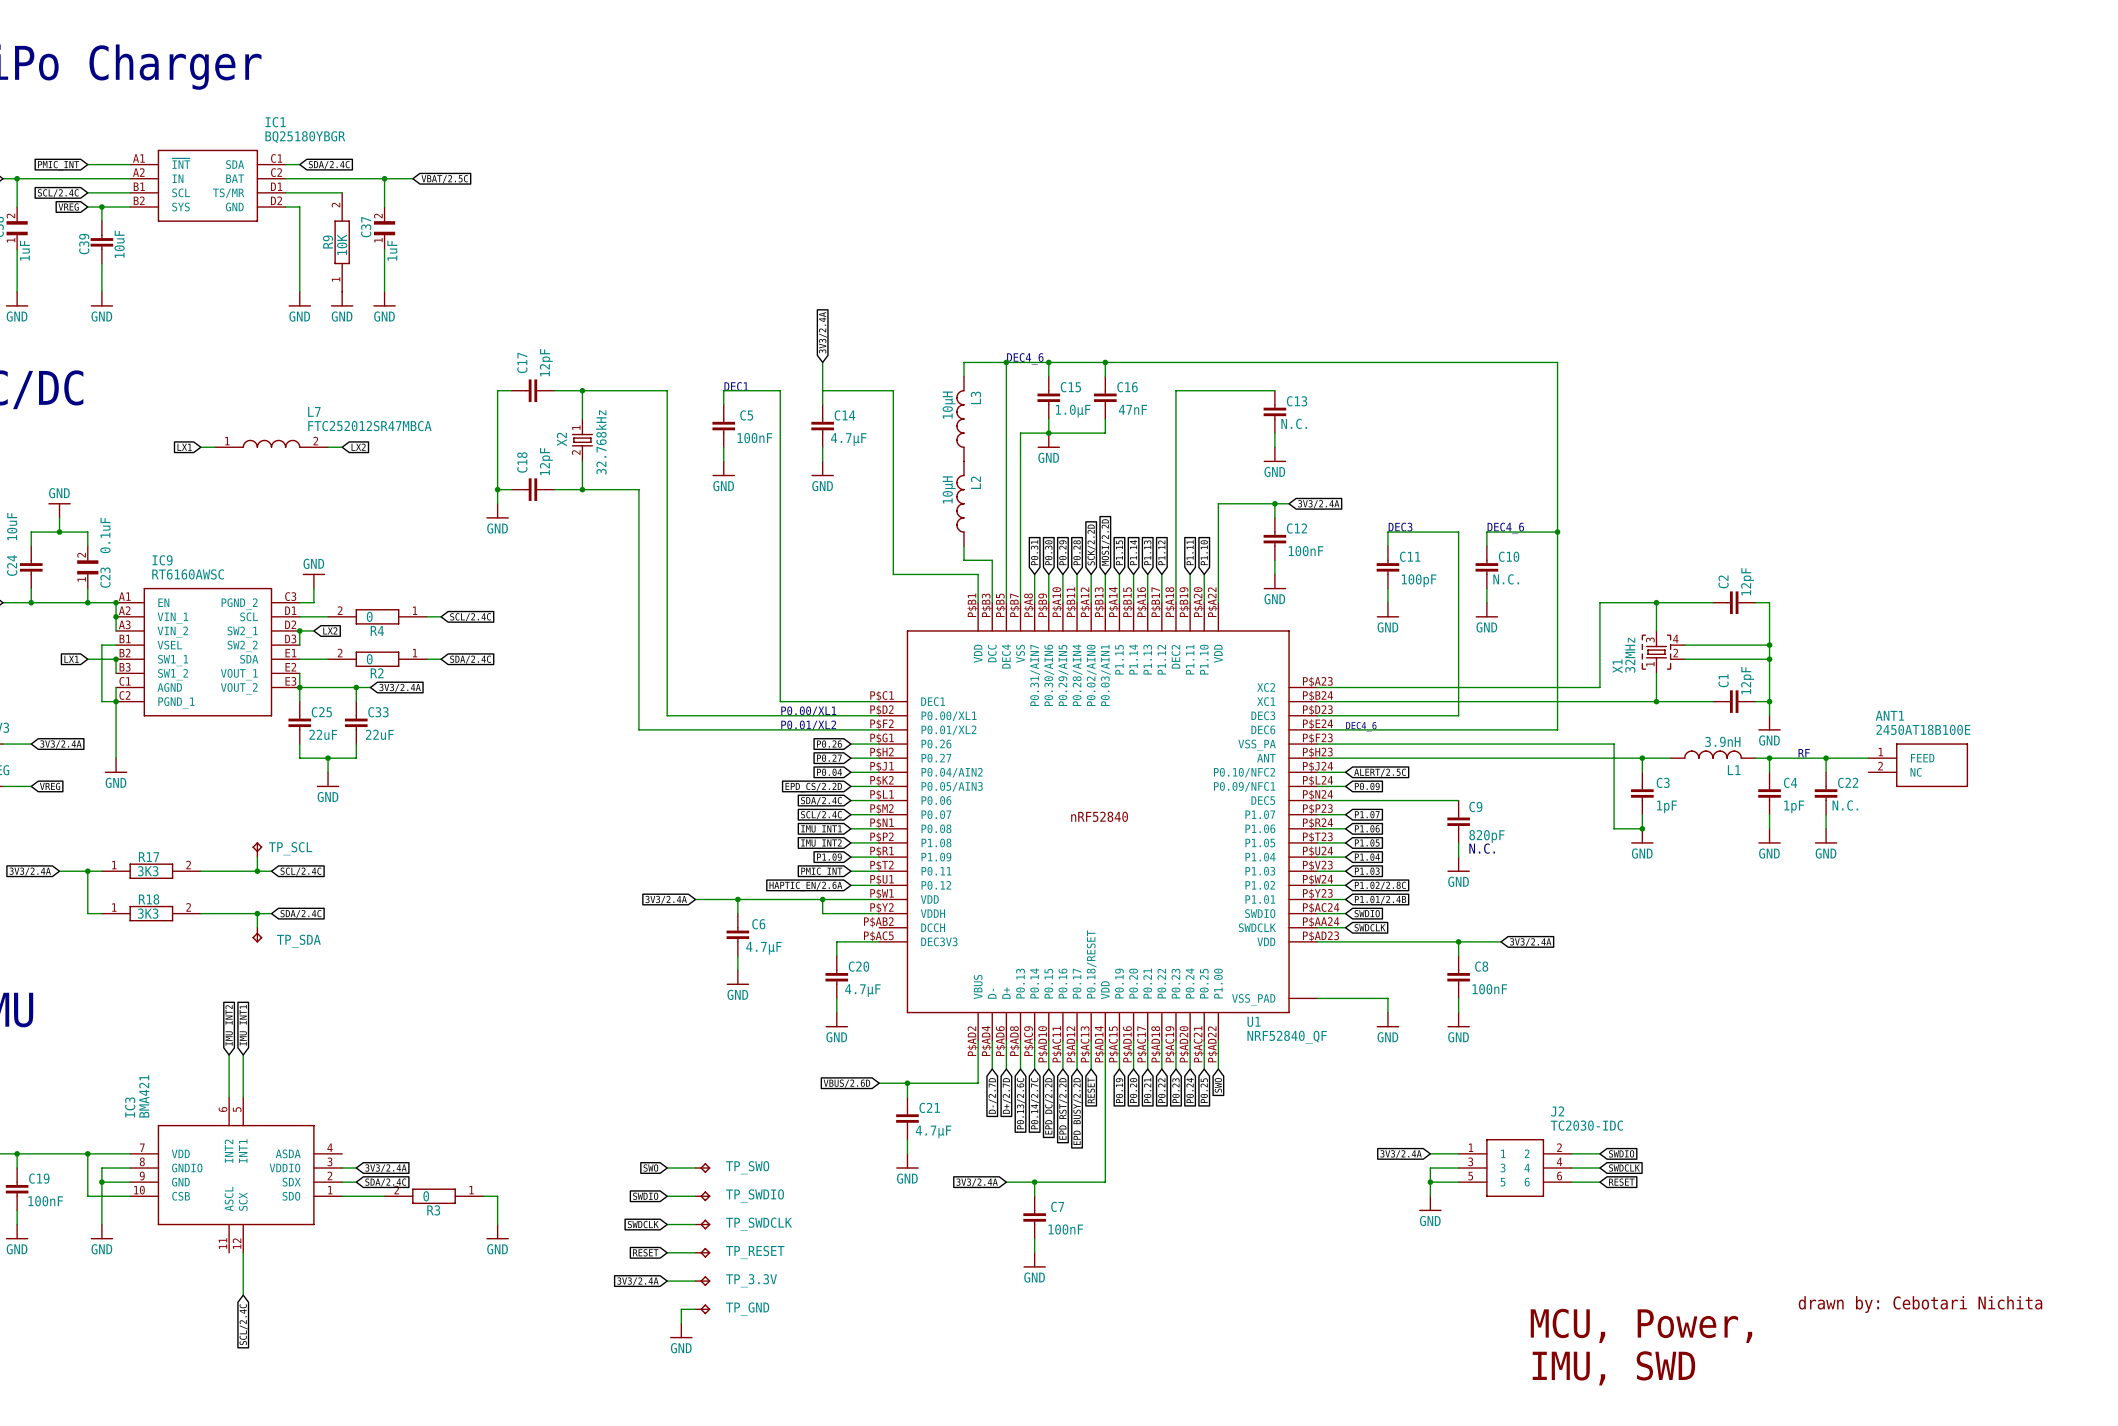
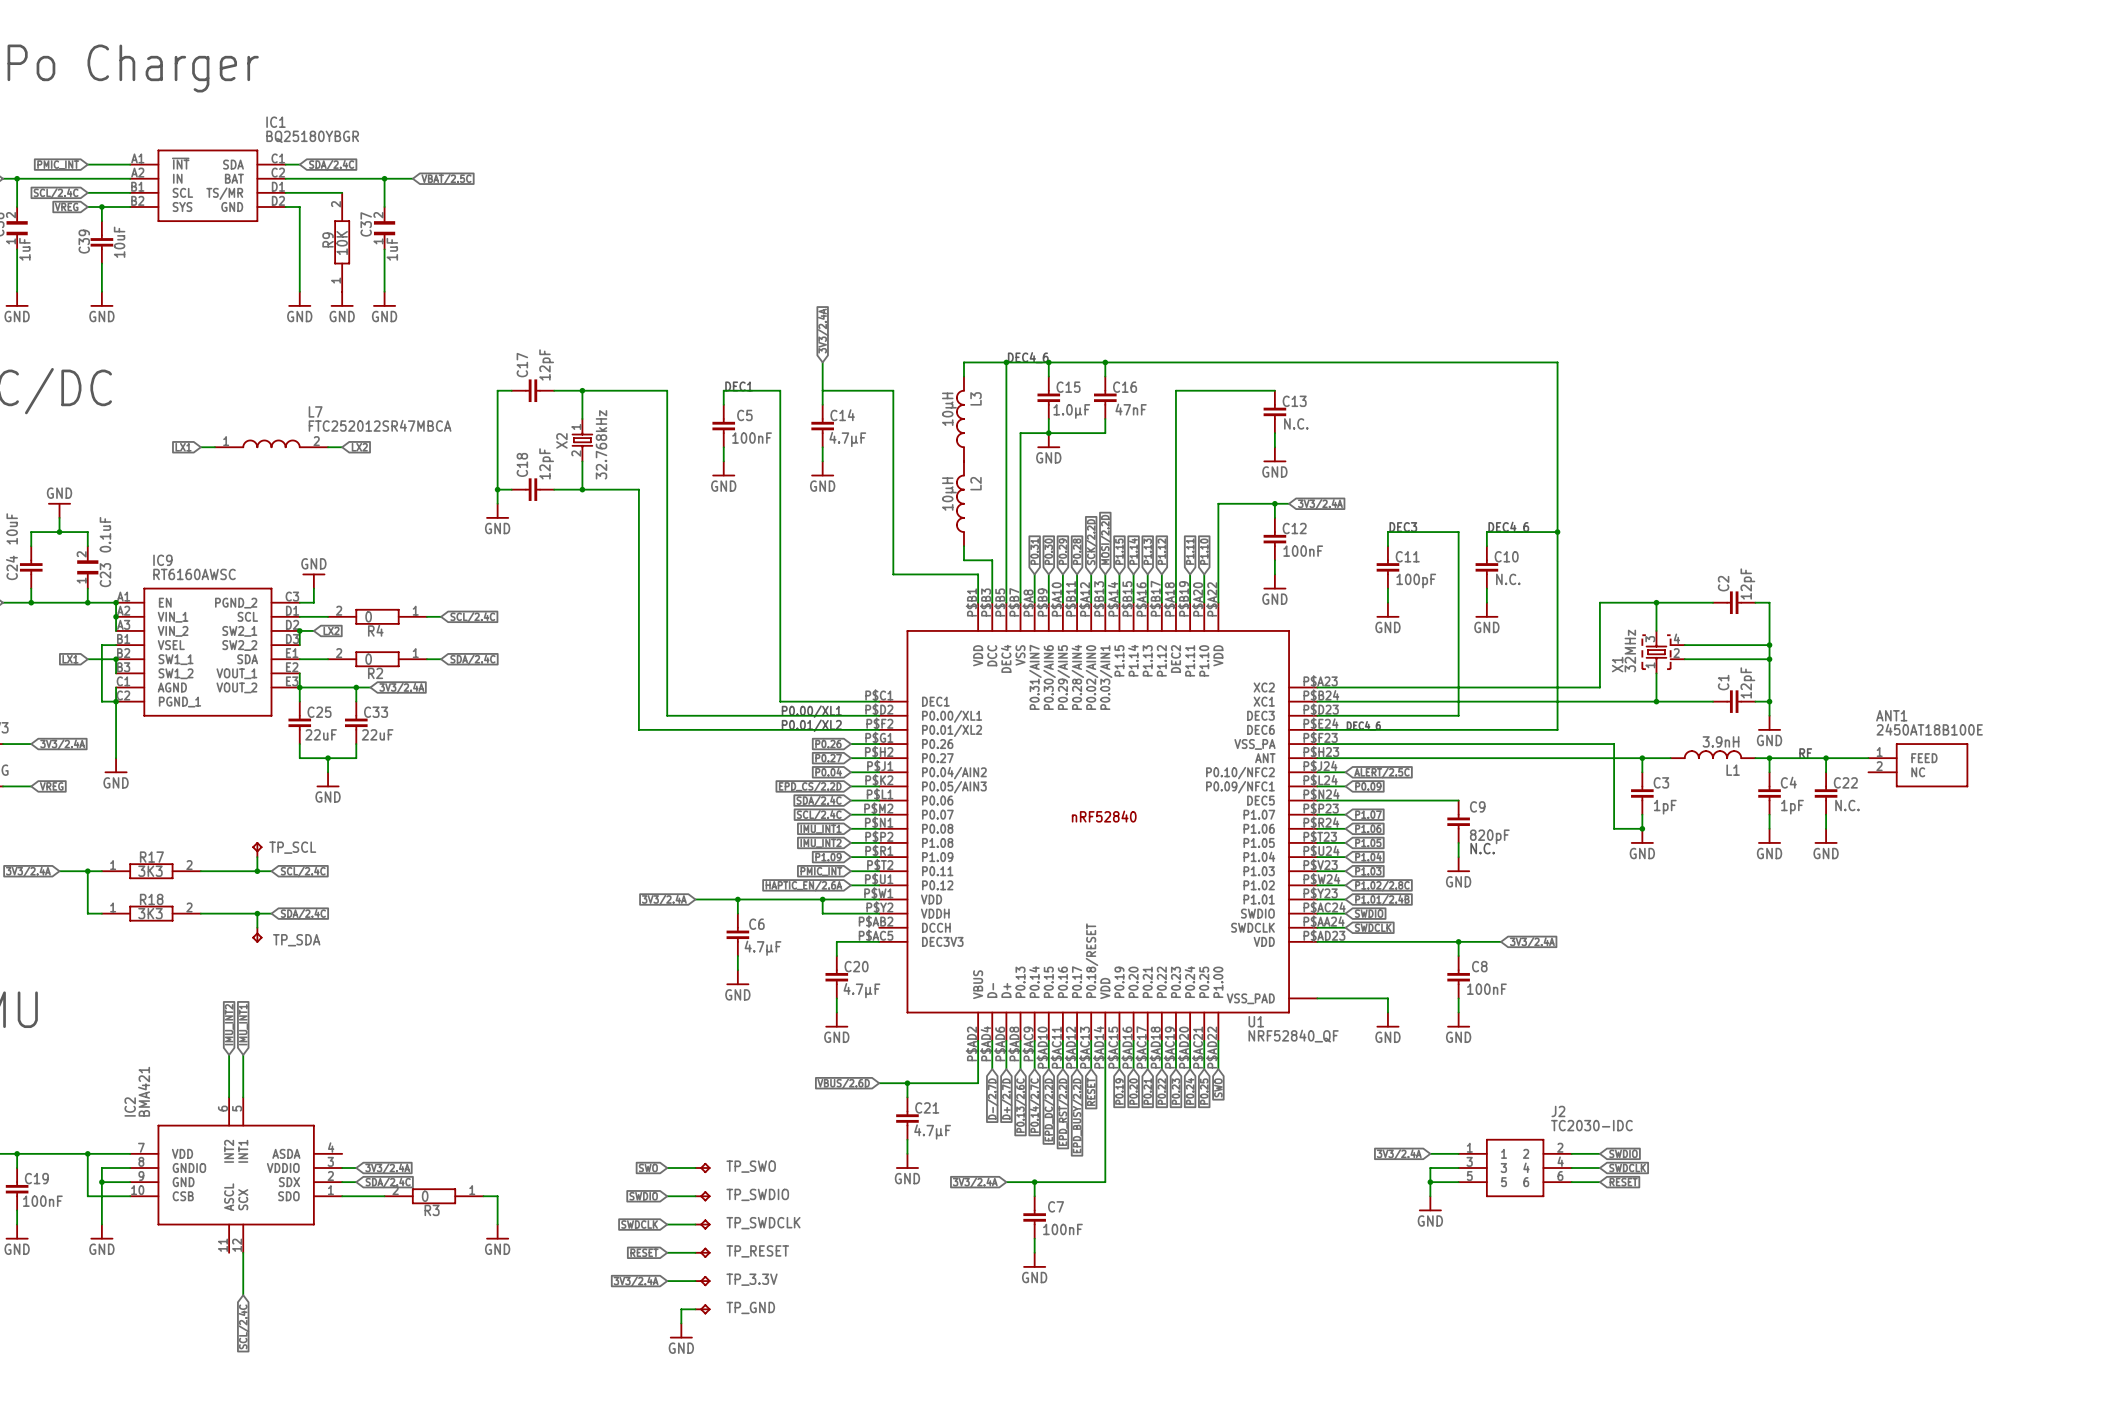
IC3 name: IC3 (130, 1107) -> IC2 (130, 1106)
text: drawn by: Cebotari Nichita (1920, 1304) -> none
text: MCU, Power, (1641, 1325) -> none
text: IMU, SWD (1613, 1368) -> none

